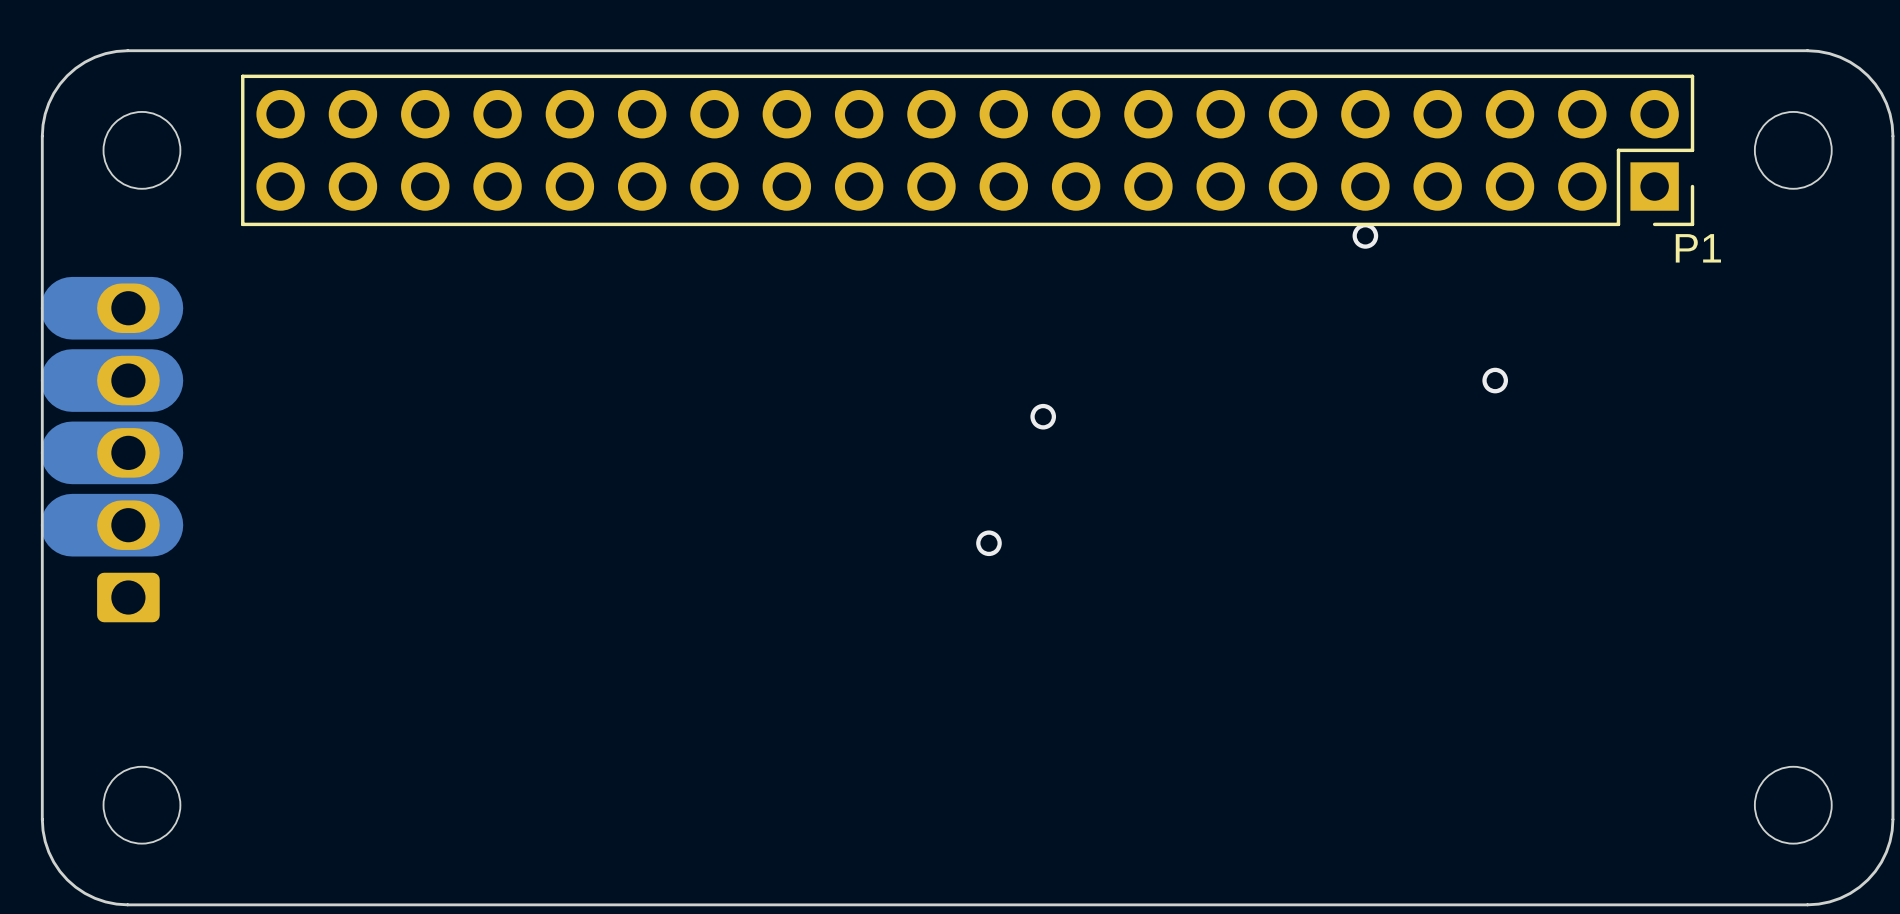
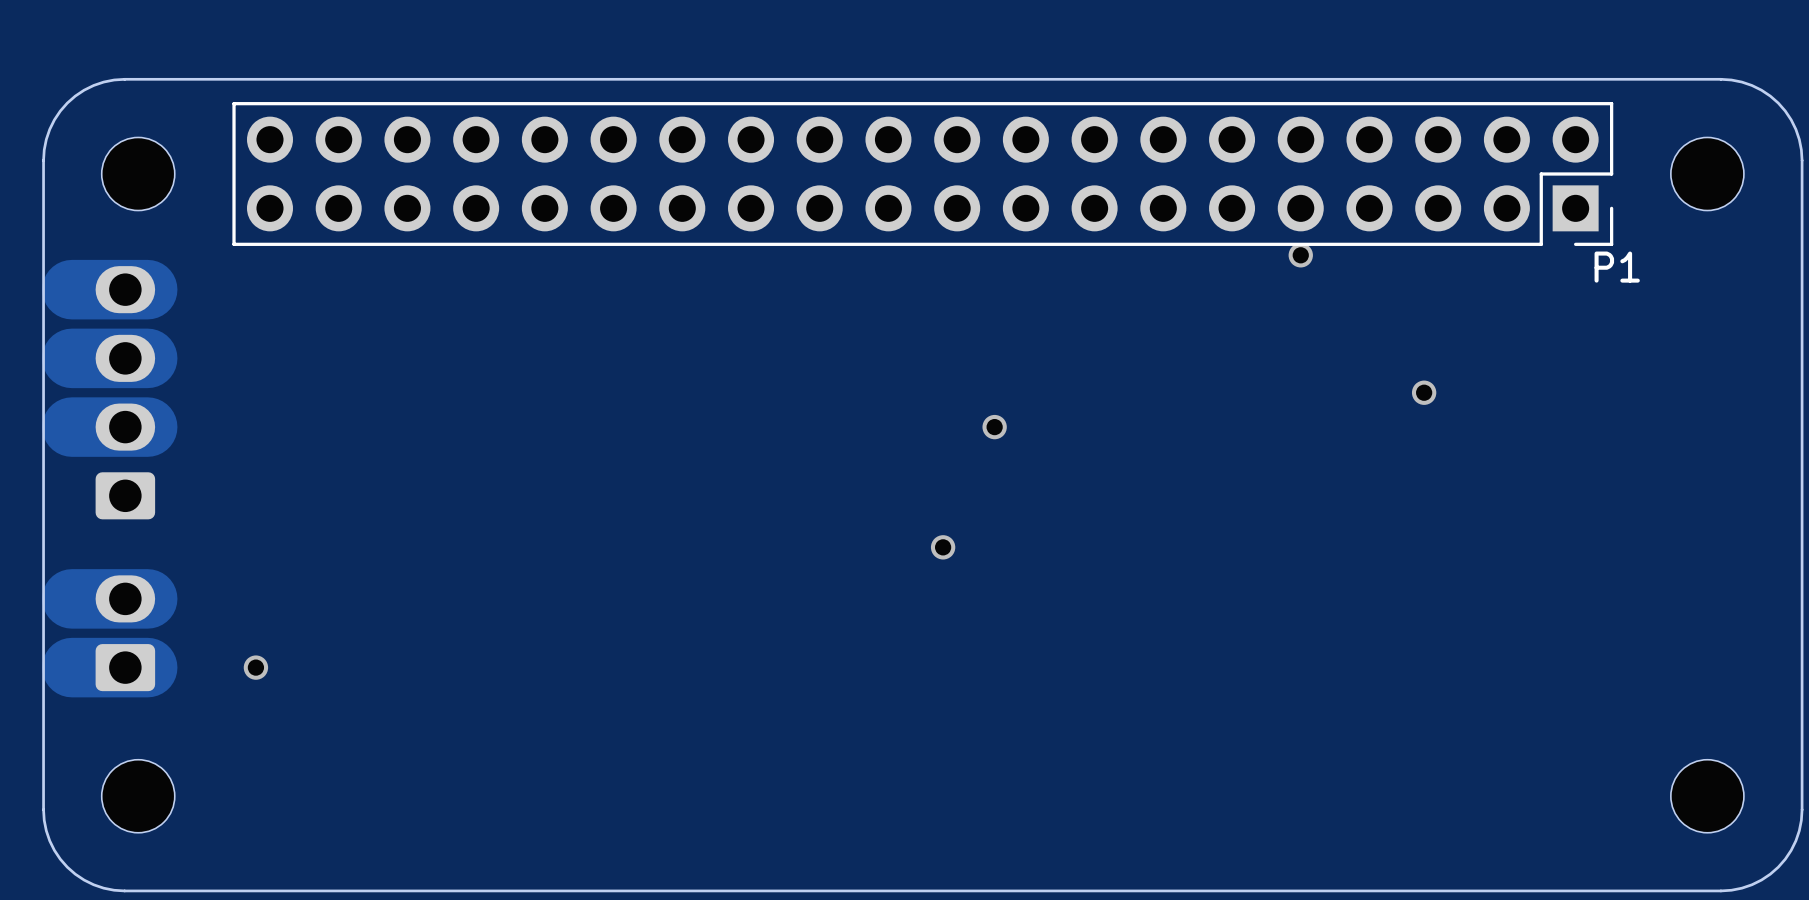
track: (151, 308) (72, 308) -> (147, 289) (71, 289)
part: none -> (125, 392)
track: (151, 380) (72, 380) -> (147, 427) (71, 427)
part: (128, 452) -> none
track: (151, 452) (72, 452) -> (147, 358) (71, 358)
track: (151, 525) (72, 525) -> (147, 598) (71, 598)
part: none -> (125, 633)
track: none -> (147, 667) (71, 667)
via: none -> (255, 667)

